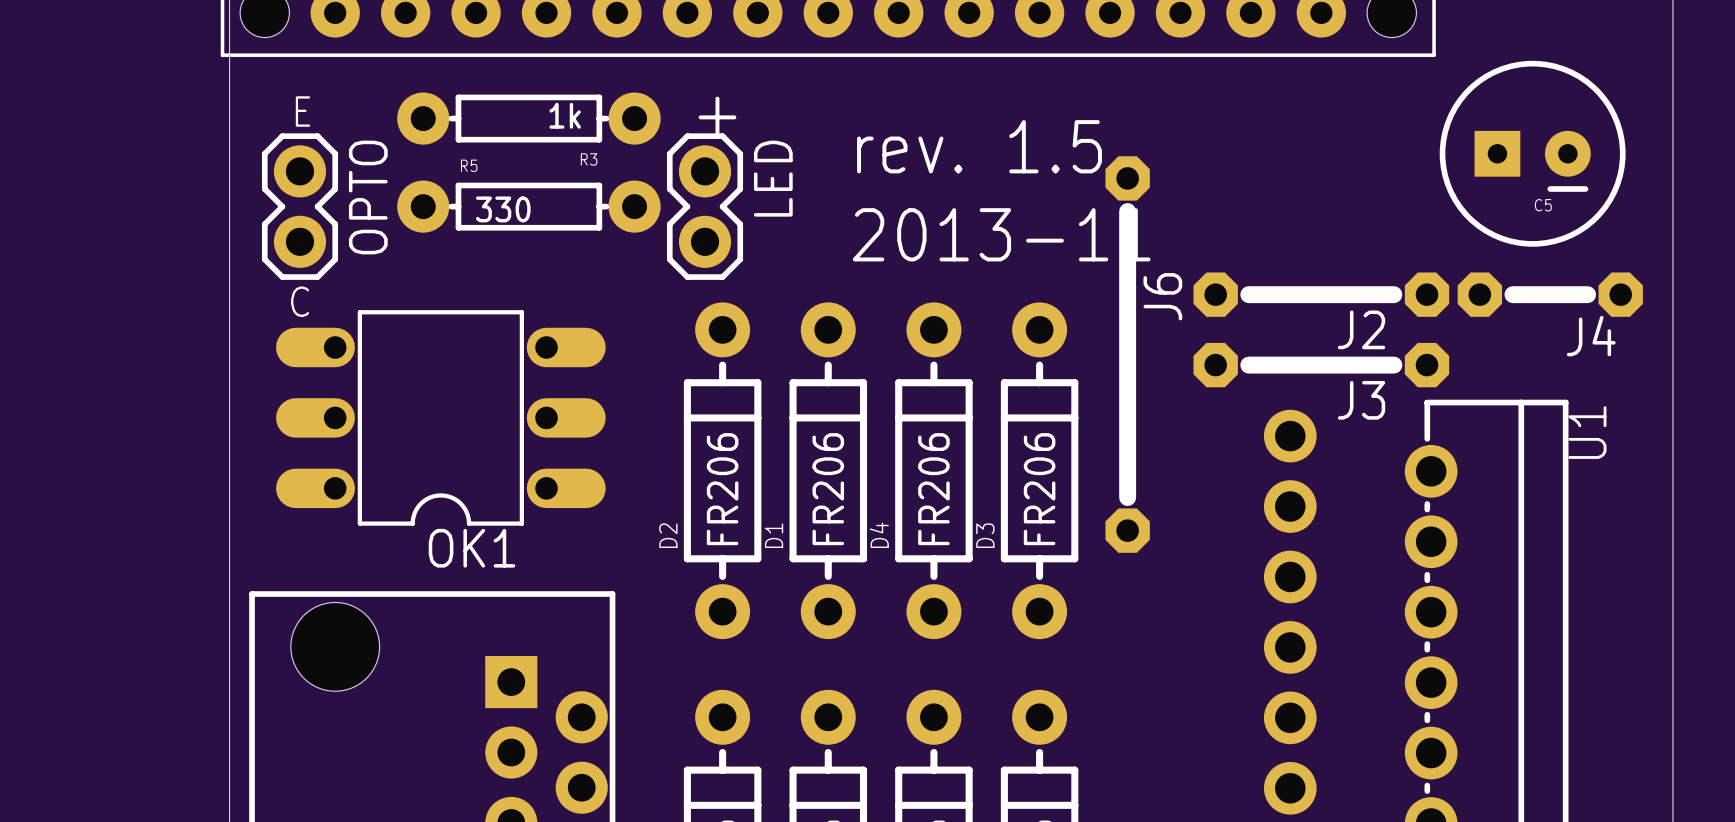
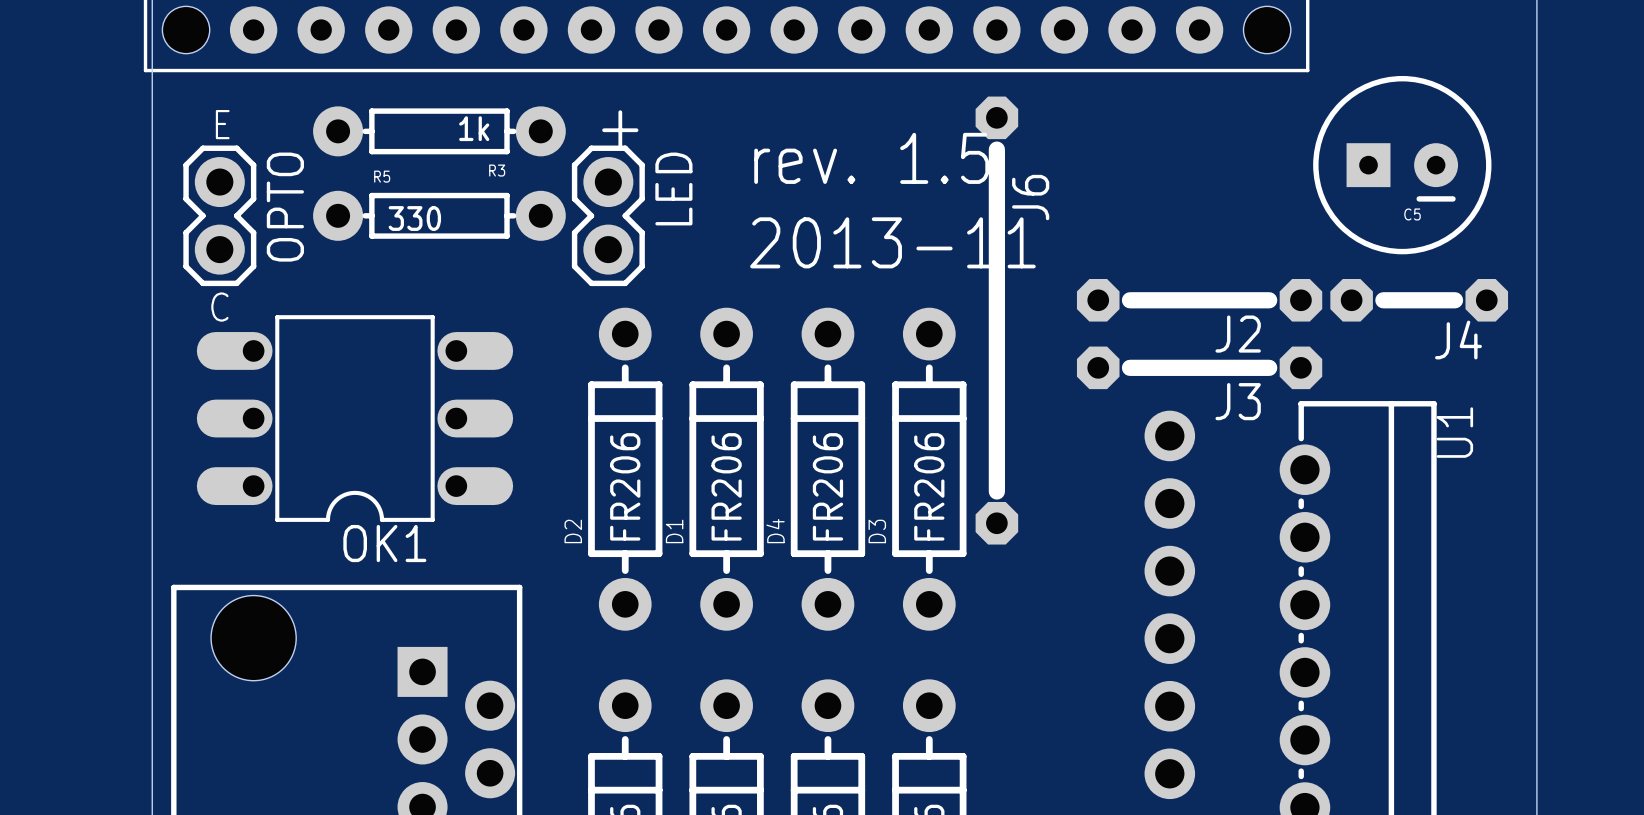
J6 footprint: [1105, 156, 1150, 553] -> [975, 96, 1019, 545]
J6 name position: J6 (1162, 296) -> J6 (1030, 197)

